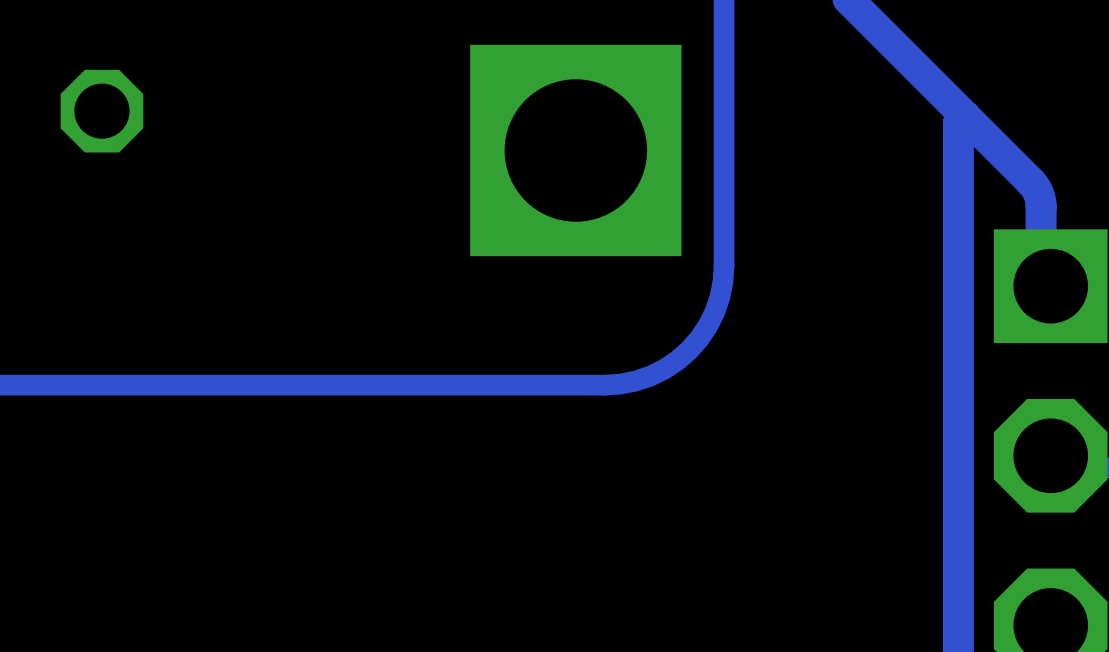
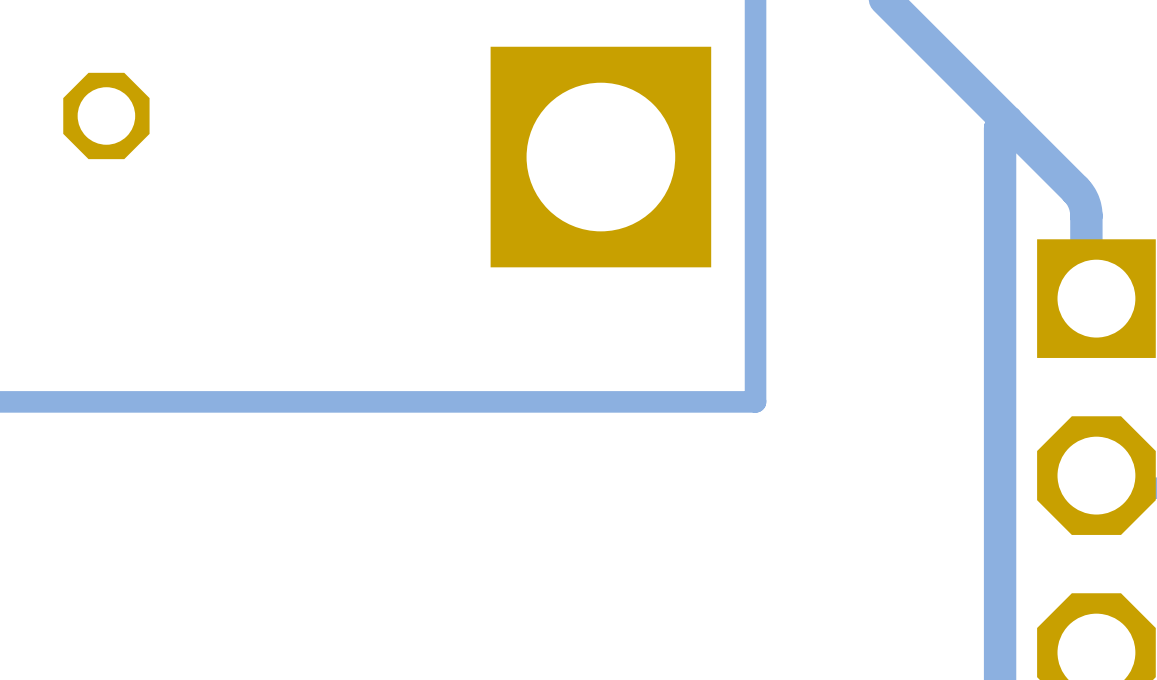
track: (724, 266) (723, 281) (714, 311) (708, 325) (689, 350) (677, 360) (650, 376) (620, 384) (604, 385) -> (755, 277) (755, 401) (631, 401)

